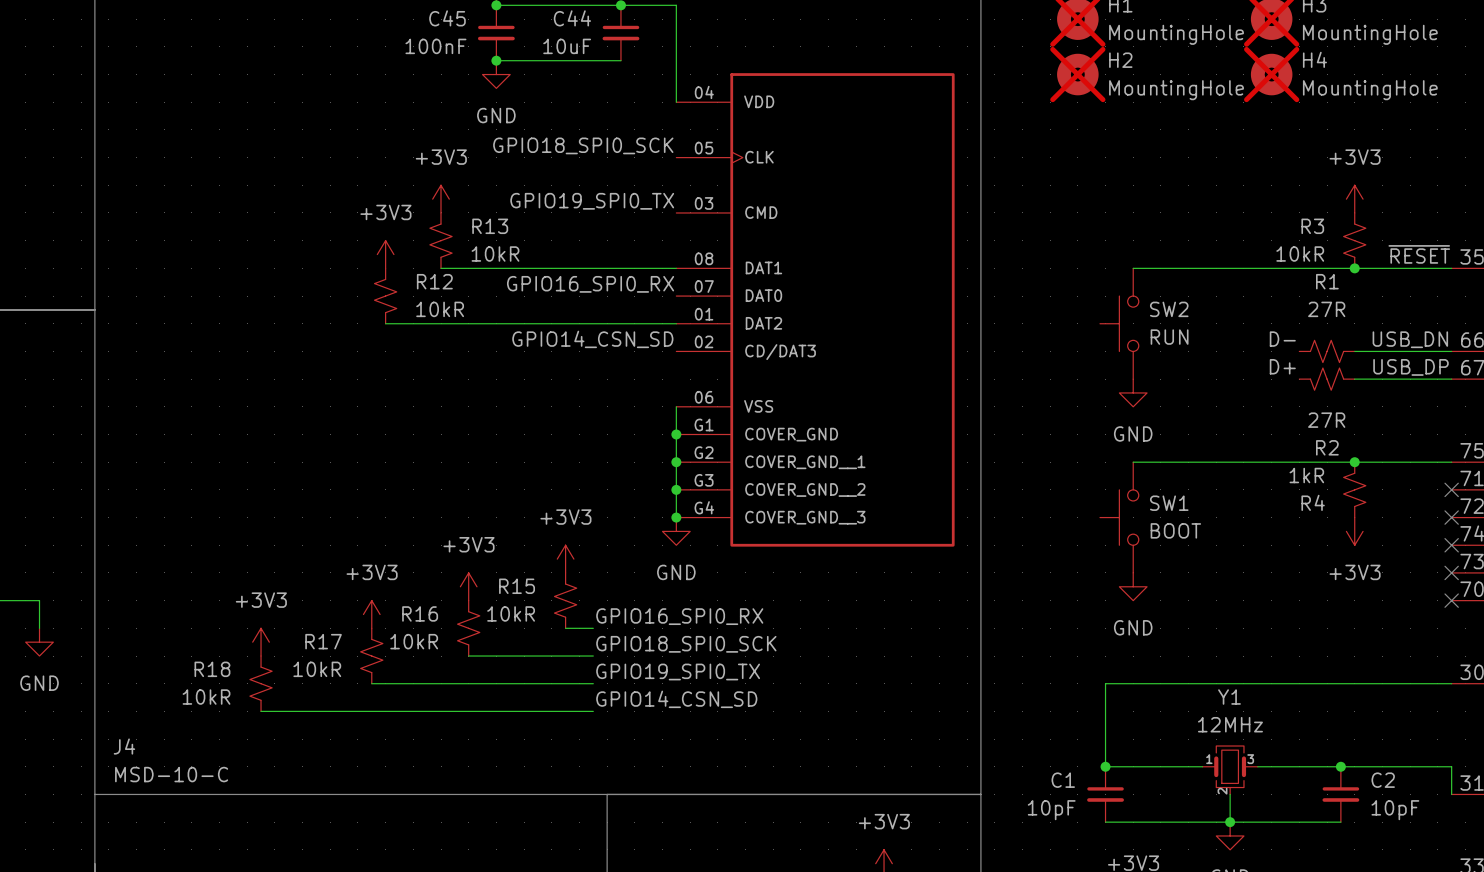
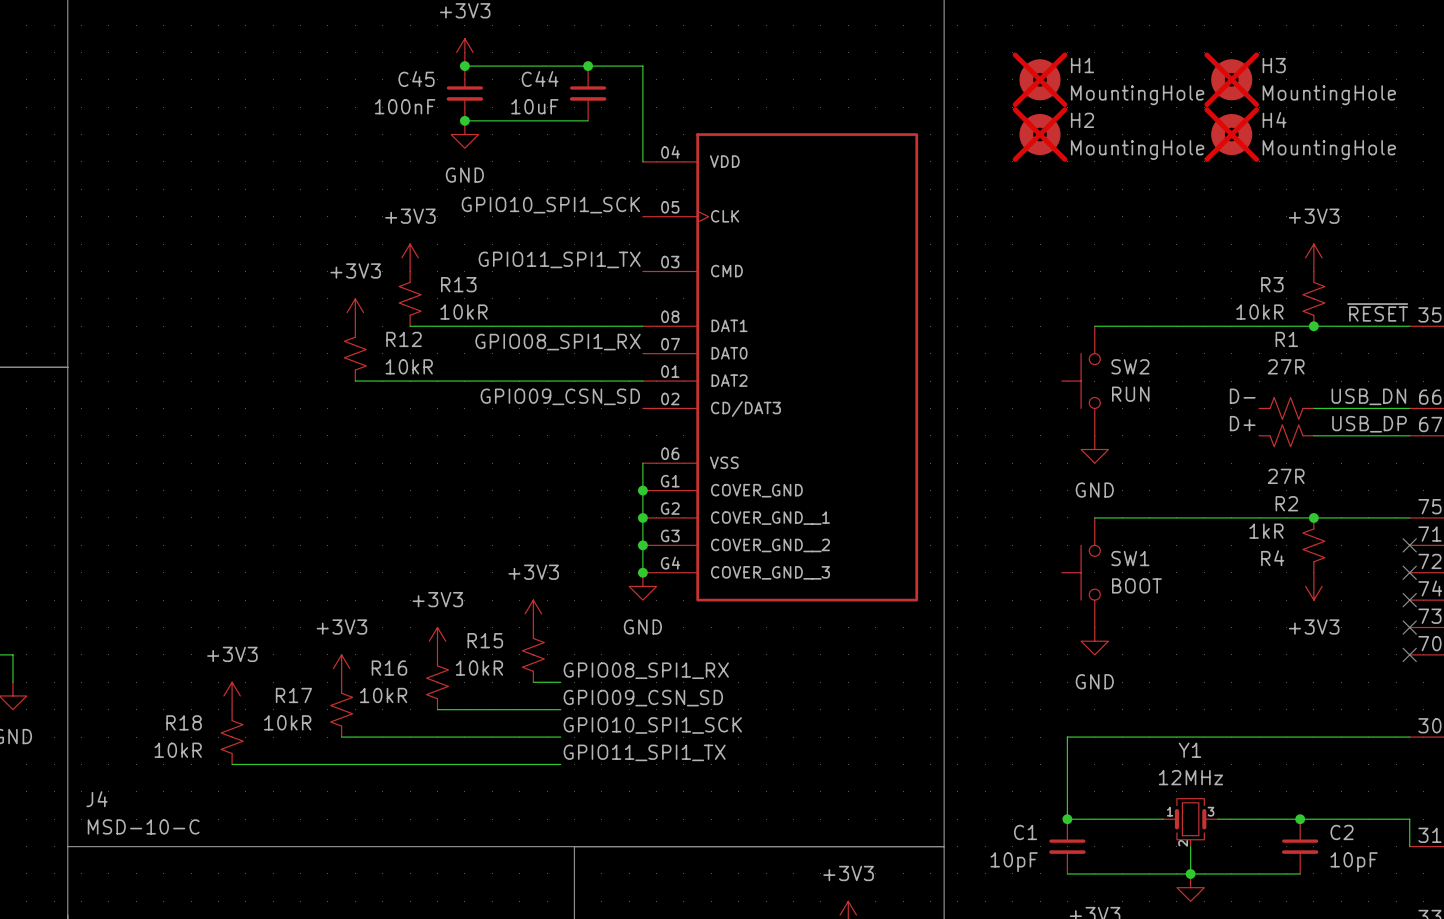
label: GPIO18_SPI0_SCK (583, 145) -> GPIO10_SPI1_SCK (550, 205)
label: GPIO19_SPI0_TX (592, 201) -> GPIO11_SPI1_TX (559, 259)
label: GPIO16_SPI0_RX (590, 284) -> GPIO08_SPI1_RX (558, 342)
label: GPIO14_CSN_SD (592, 339) -> GPIO09_CSN_SD (560, 396)
label: GPIO16_SPI0_RX (679, 616) -> GPIO08_SPI1_RX (646, 670)
label: GPIO18_SPI0_SCK (686, 644) -> GPIO09_CSN_SD (643, 698)
label: GPIO19_SPI0_TX (678, 672) -> GPIO10_SPI1_SCK (652, 725)
label: GPIO14_CSN_SD (676, 699) -> GPIO11_SPI1_TX (644, 752)

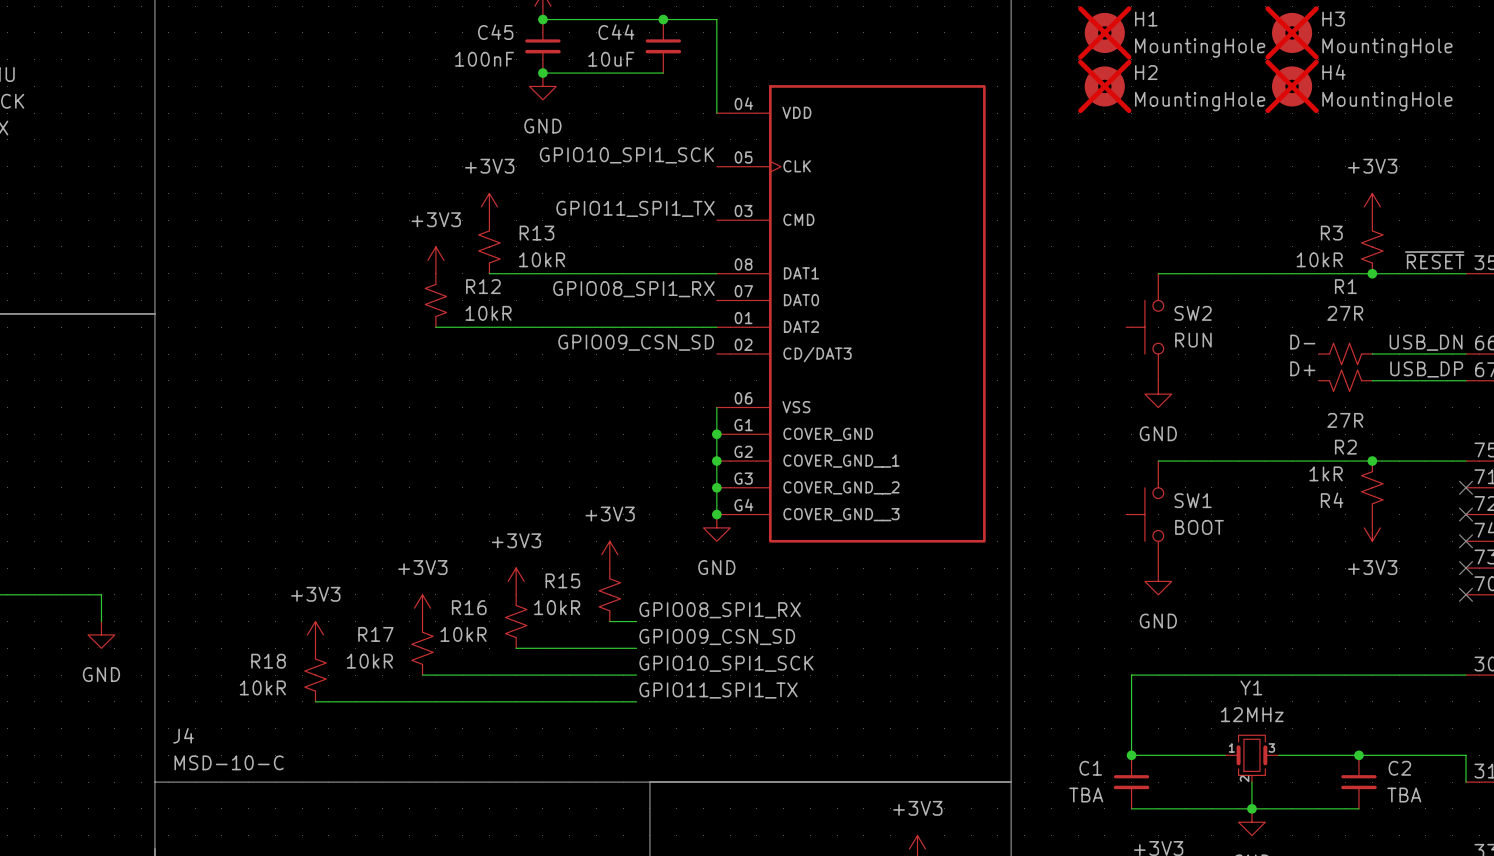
C1 value: 10pF (1014, 862) -> TBA (1086, 795)
C2 value: 10pF (1354, 862) -> TBA (1404, 795)

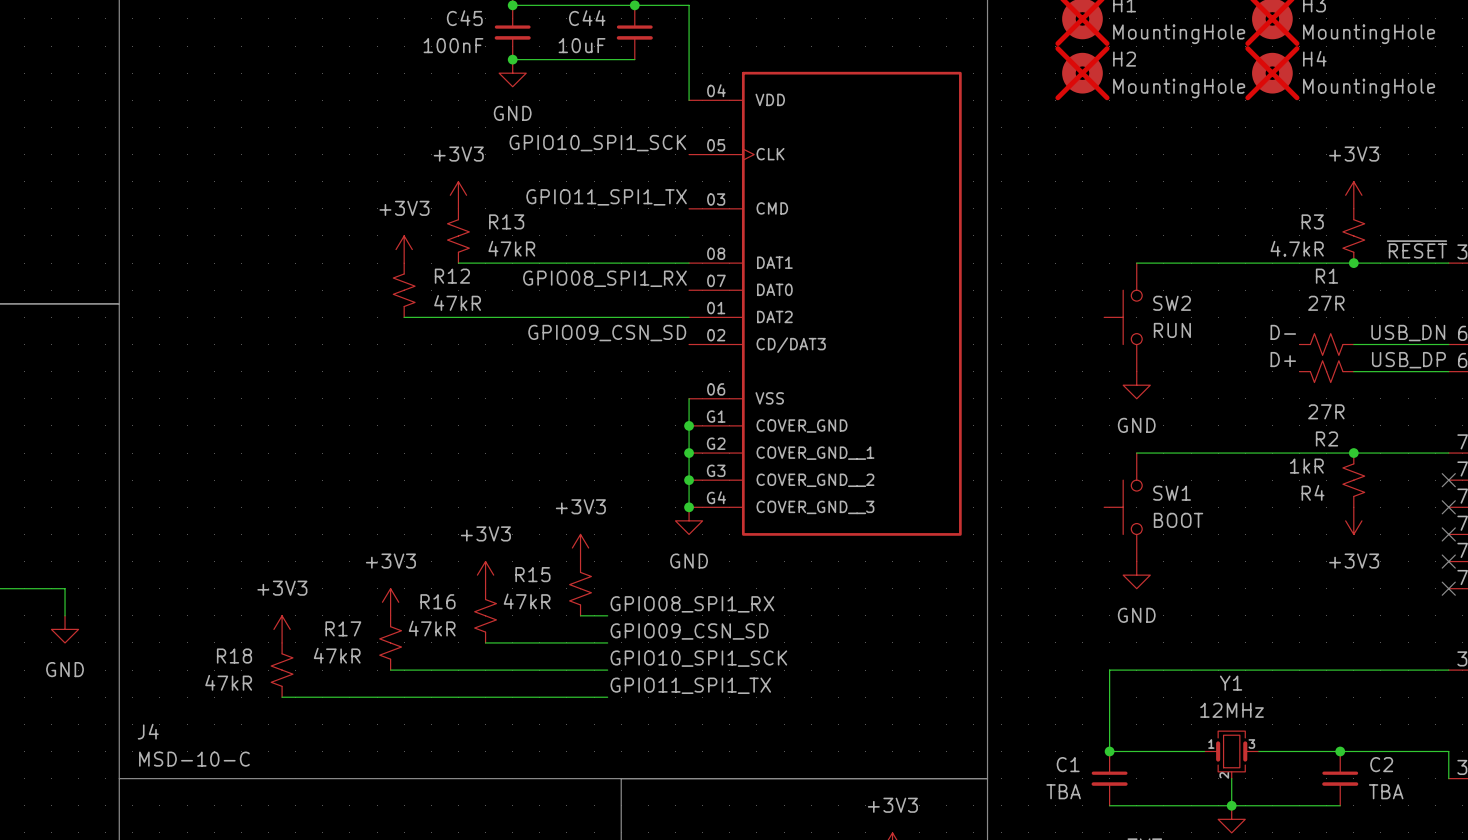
R13 value: 10kR (542, 259) -> 47kR (511, 248)
R3 value: 10kR (1319, 259) -> 4.7kR (1297, 248)
R12 value: 10kR (488, 313) -> 47kR (457, 302)
R15 value: 10kR (557, 607) -> 47kR (527, 601)
R16 value: 10kR (463, 634) -> 47kR (432, 628)
R17 value: 10kR (369, 661) -> 47kR (337, 655)
R18 value: 10kR (262, 687) -> 47kR (228, 682)

